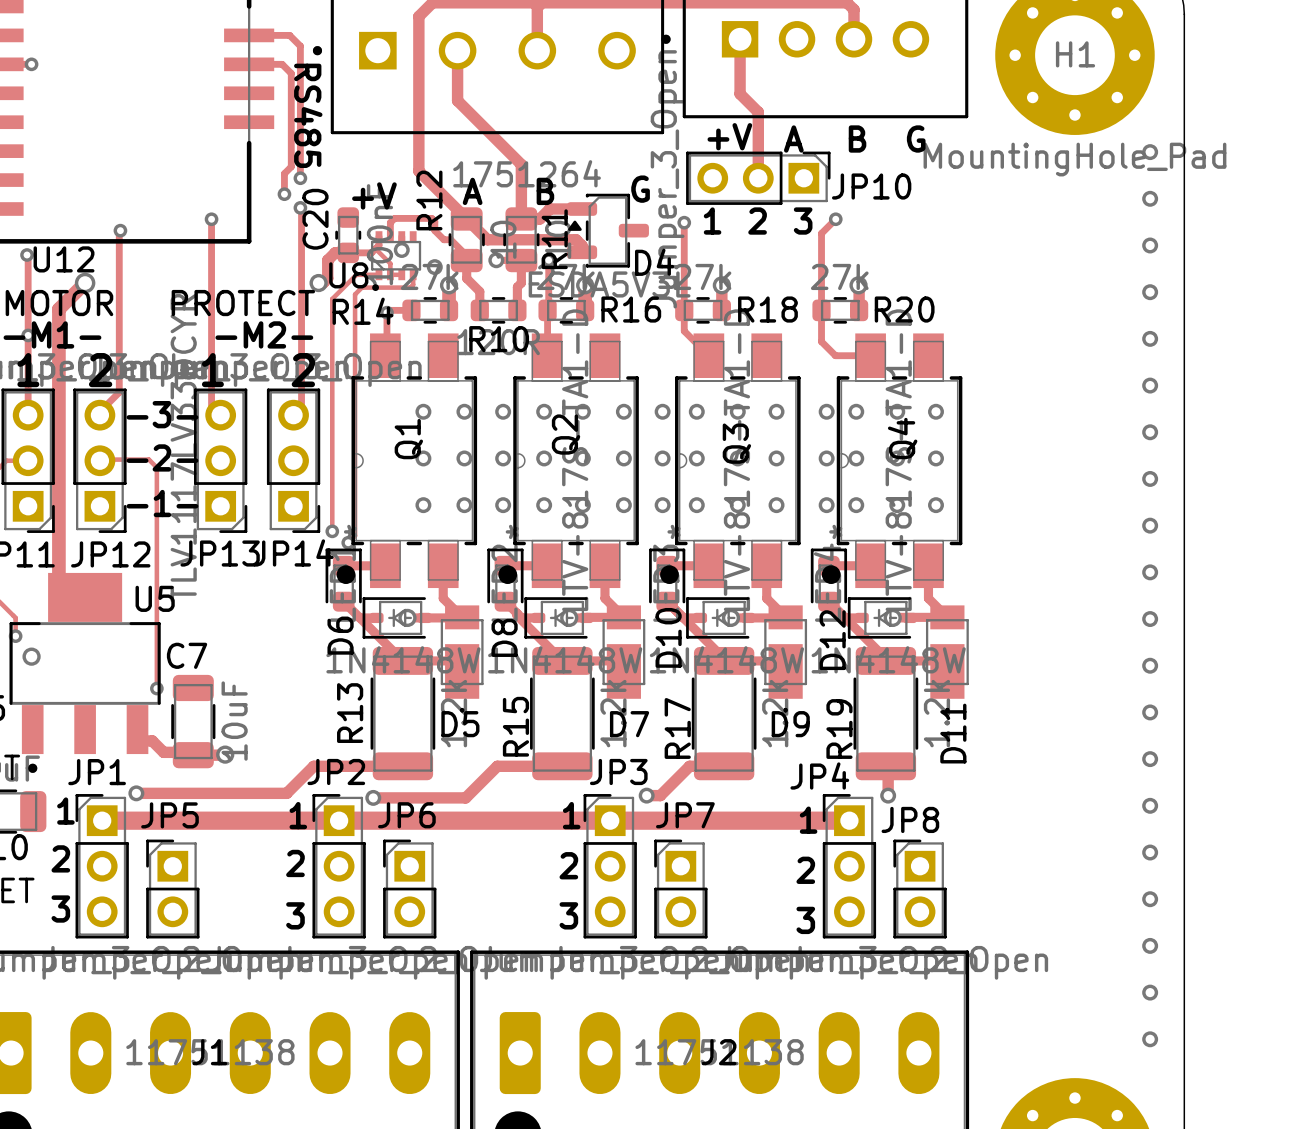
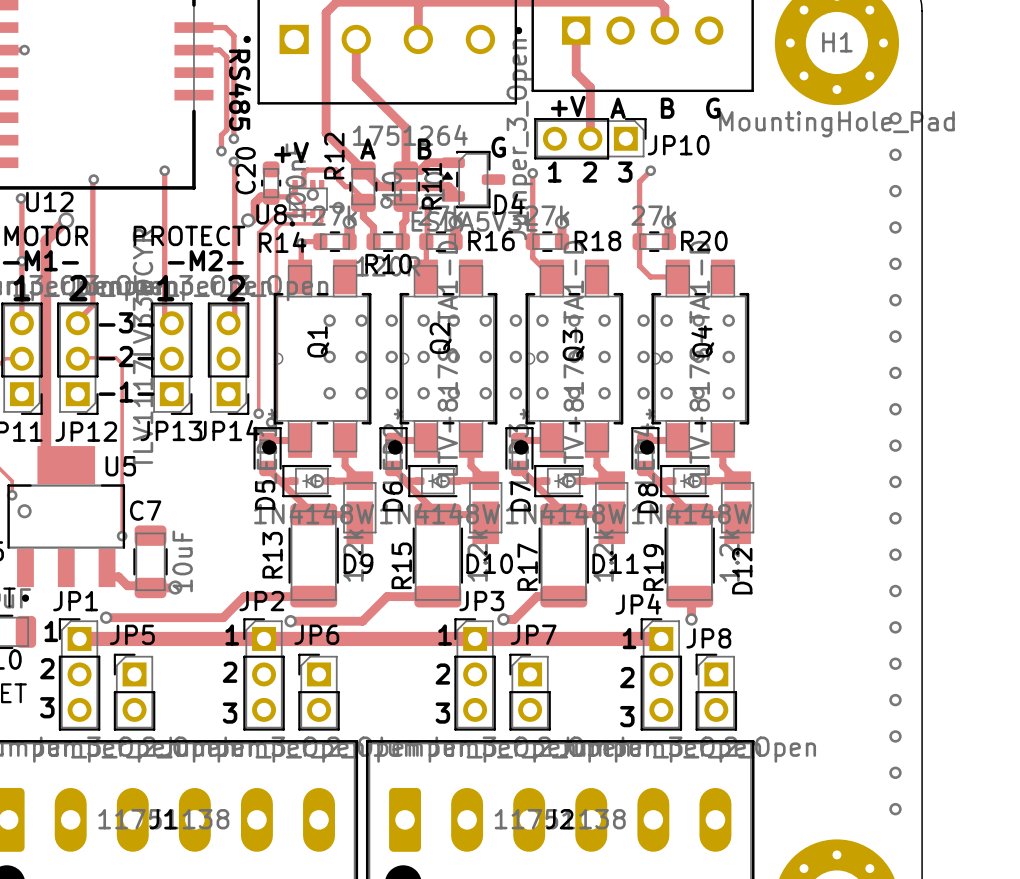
D6 name: D6 (340, 635) -> D5 (265, 494)
D8 name: D8 (504, 637) -> D6 (392, 496)
D10 name: D10 (668, 637) -> D7 (520, 496)
D12 name: D12 (832, 640) -> D8 (648, 498)
D5 name: D5 (460, 724) -> D9 (358, 563)
D7 name: D7 (629, 724) -> D10 (489, 563)
D9 name: D9 (790, 724) -> D11 (615, 563)
D11 name: D11 (953, 733) -> D12 (742, 571)

